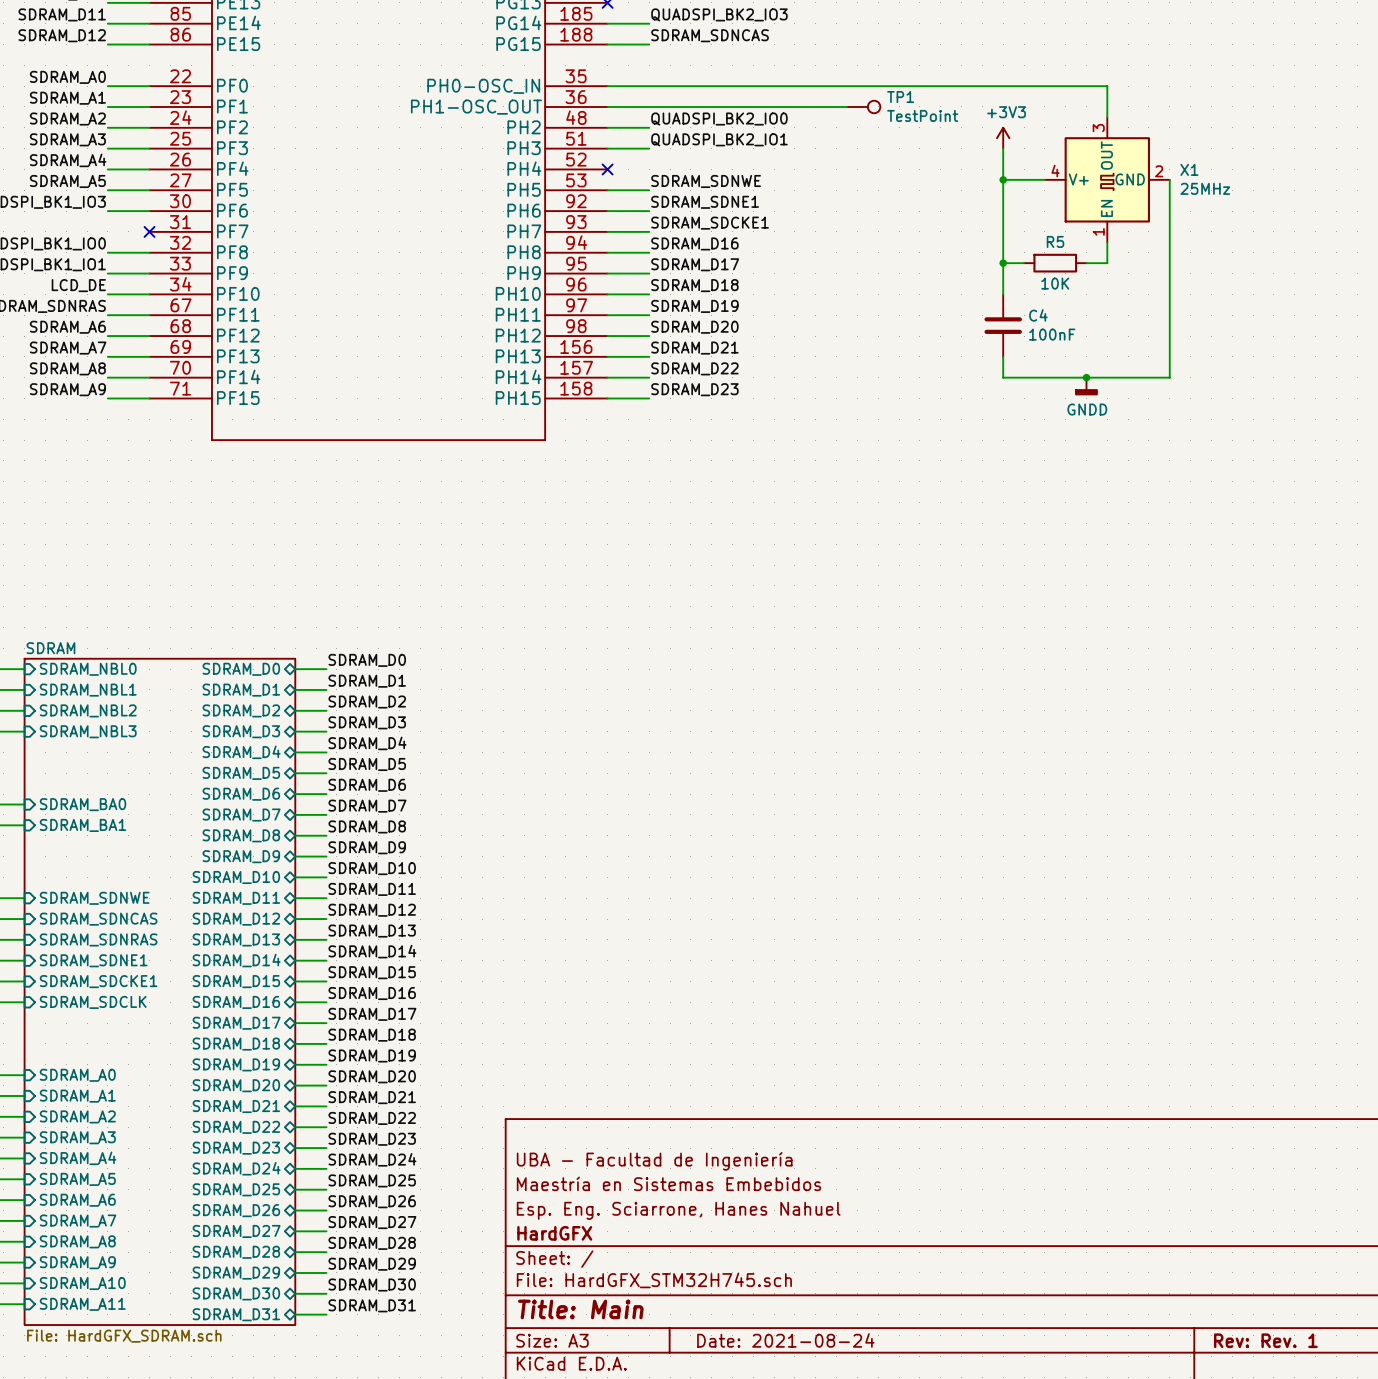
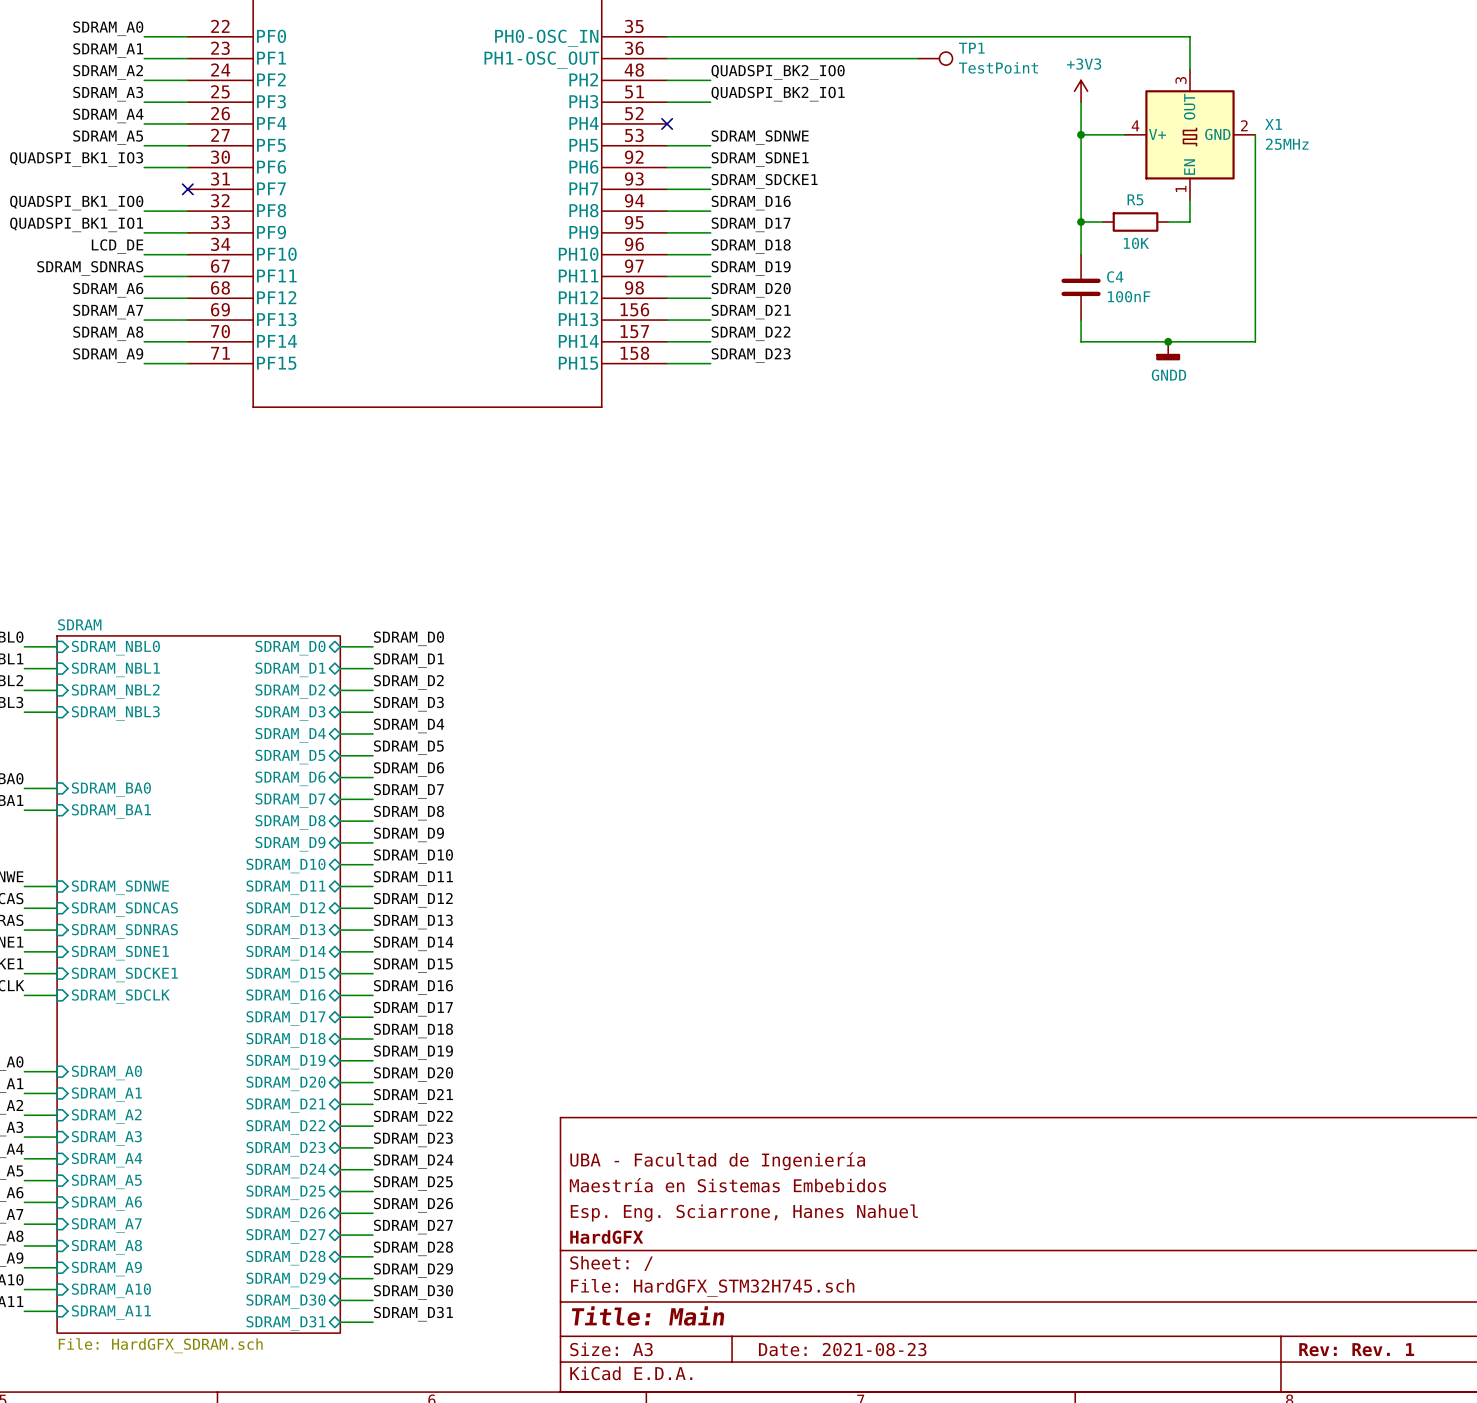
title block: Date: 2021-08-24 (785, 1340) -> Date: 2021-08-23 (842, 1349)

